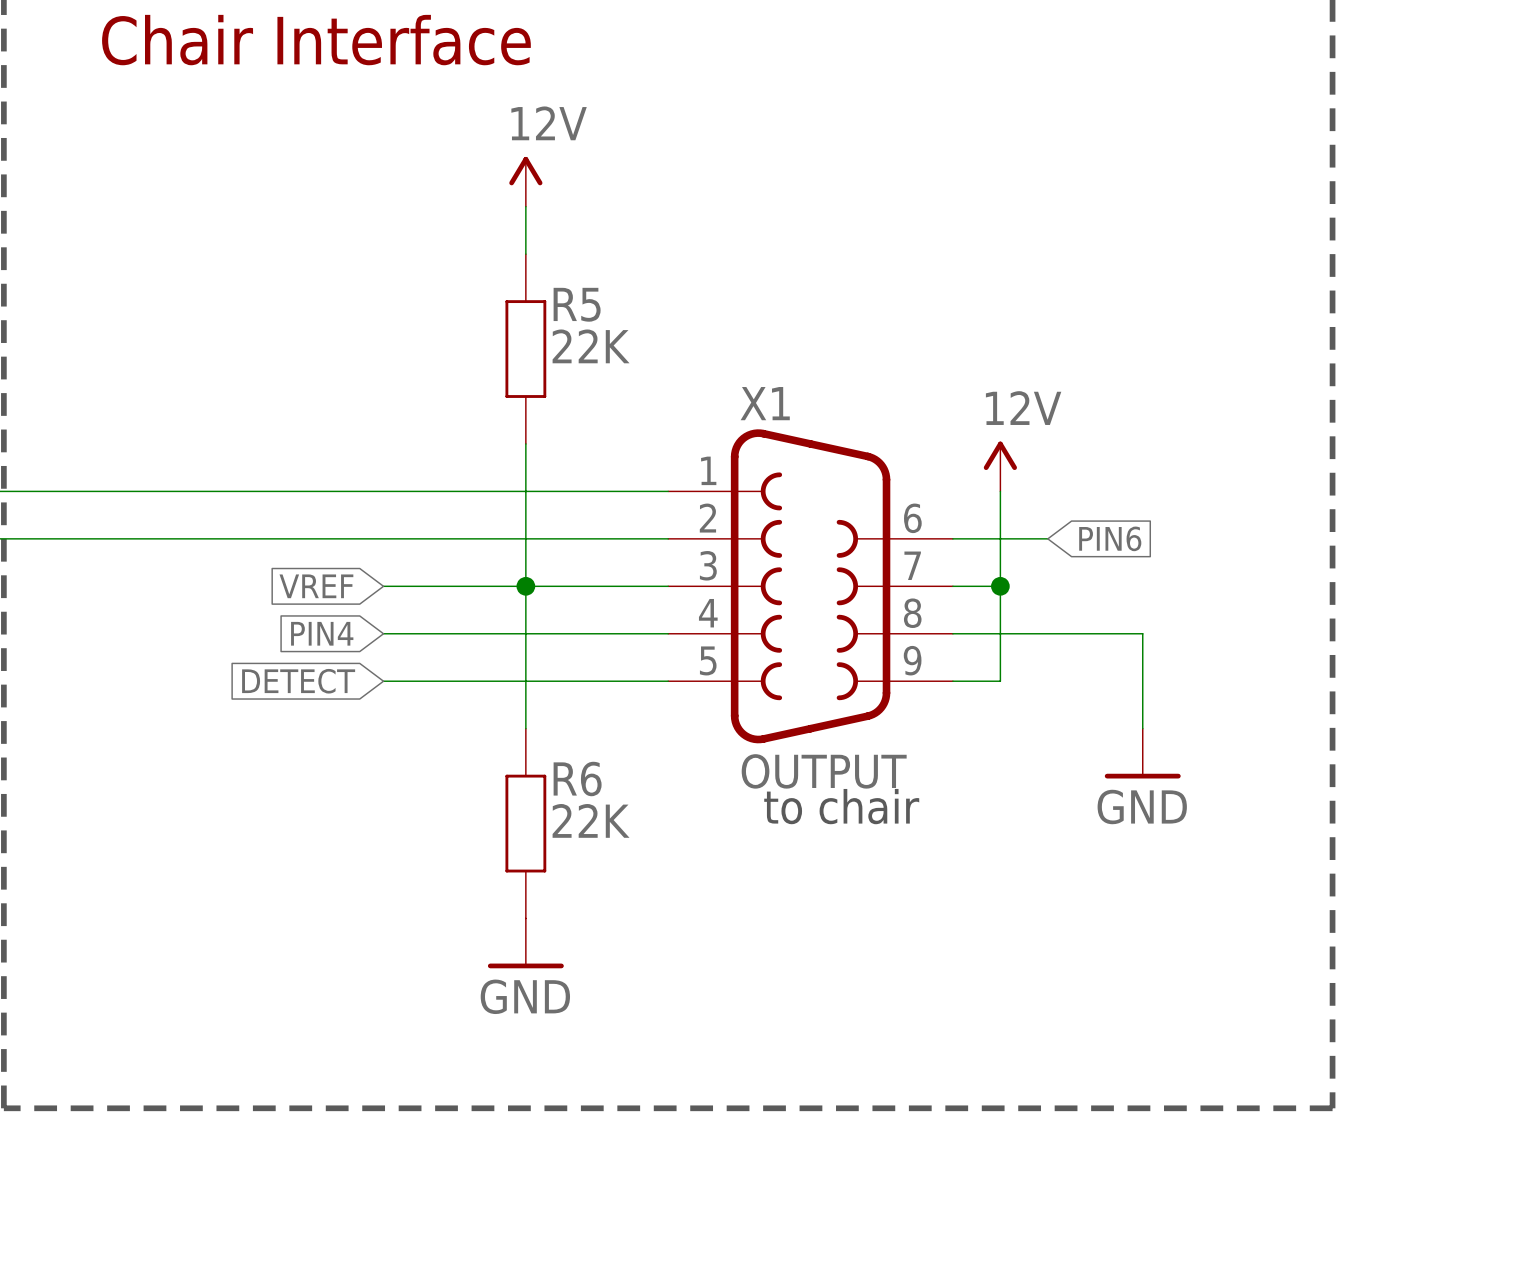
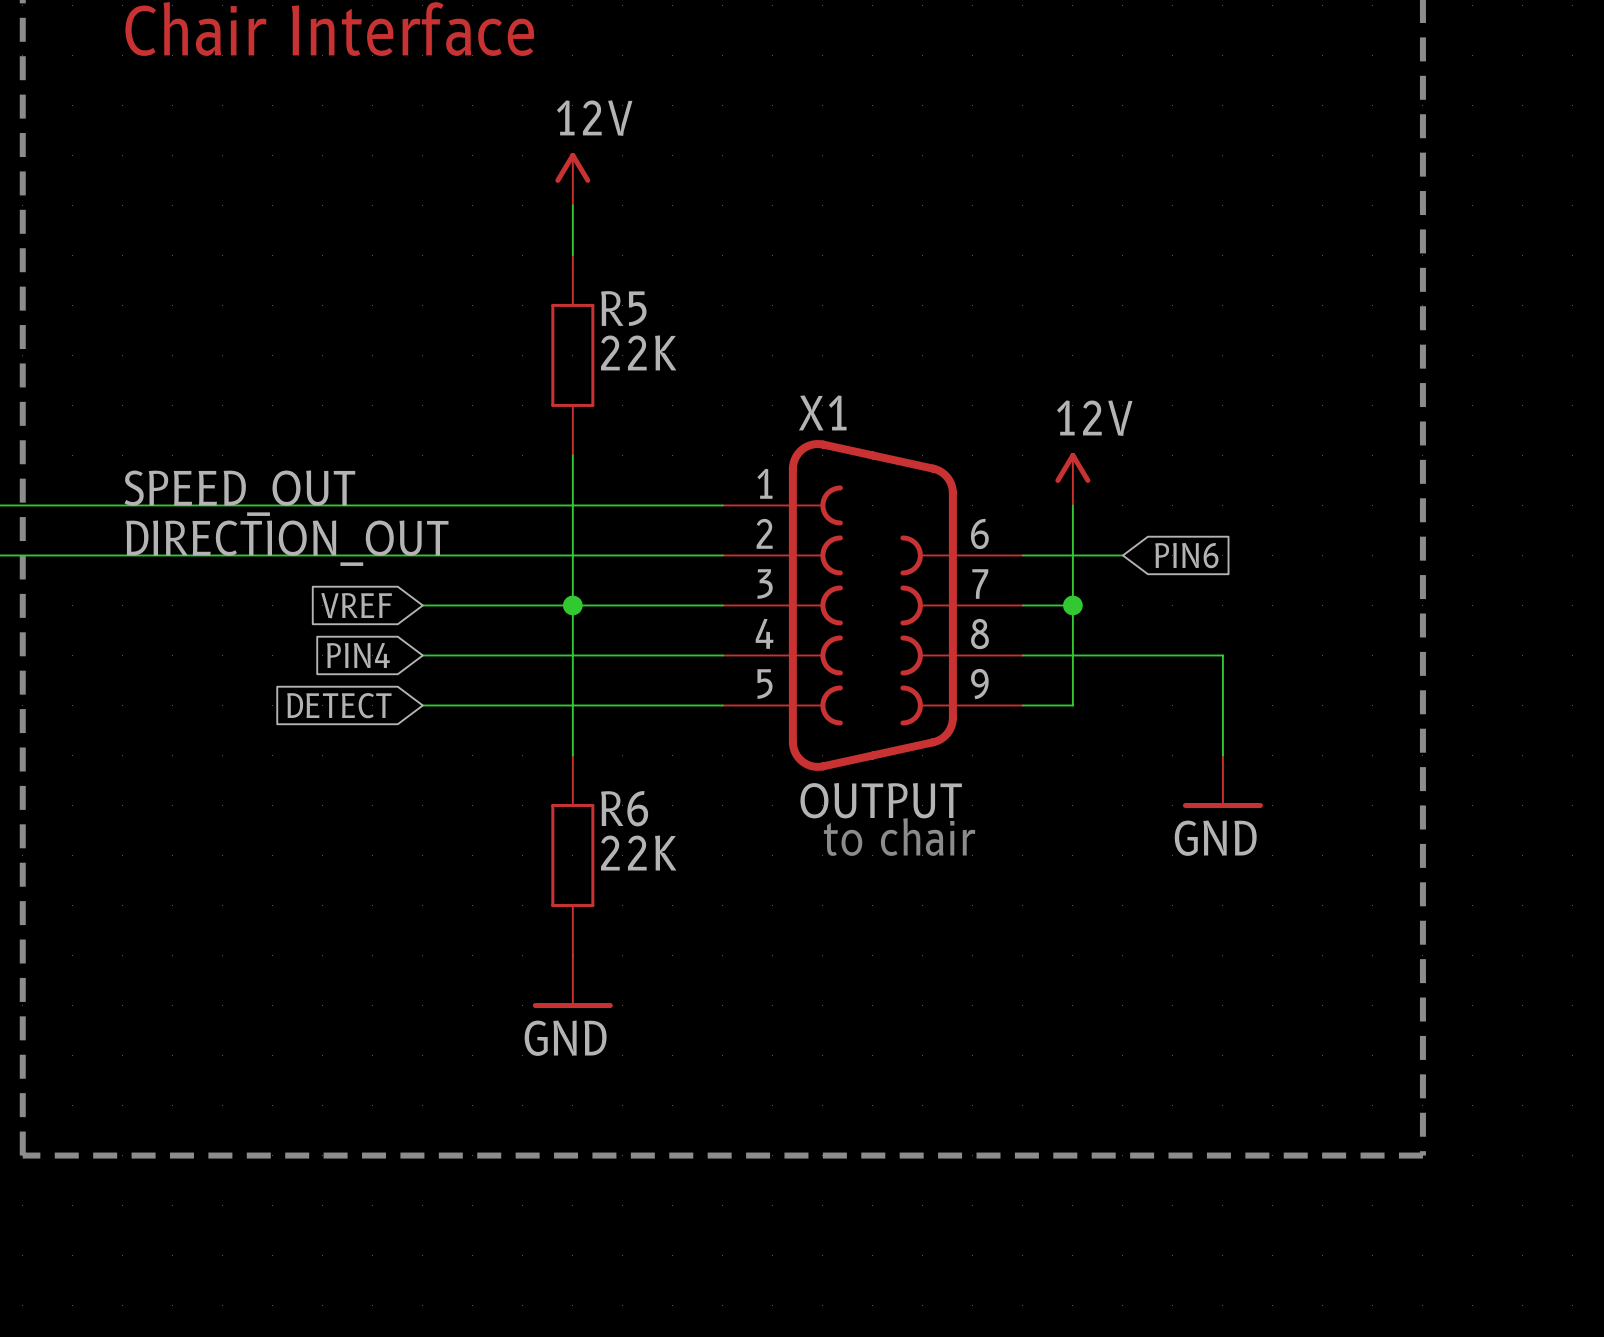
label: none -> SPEED_OUT (239, 493)
label: none -> DIRECTION_OUT (287, 543)

